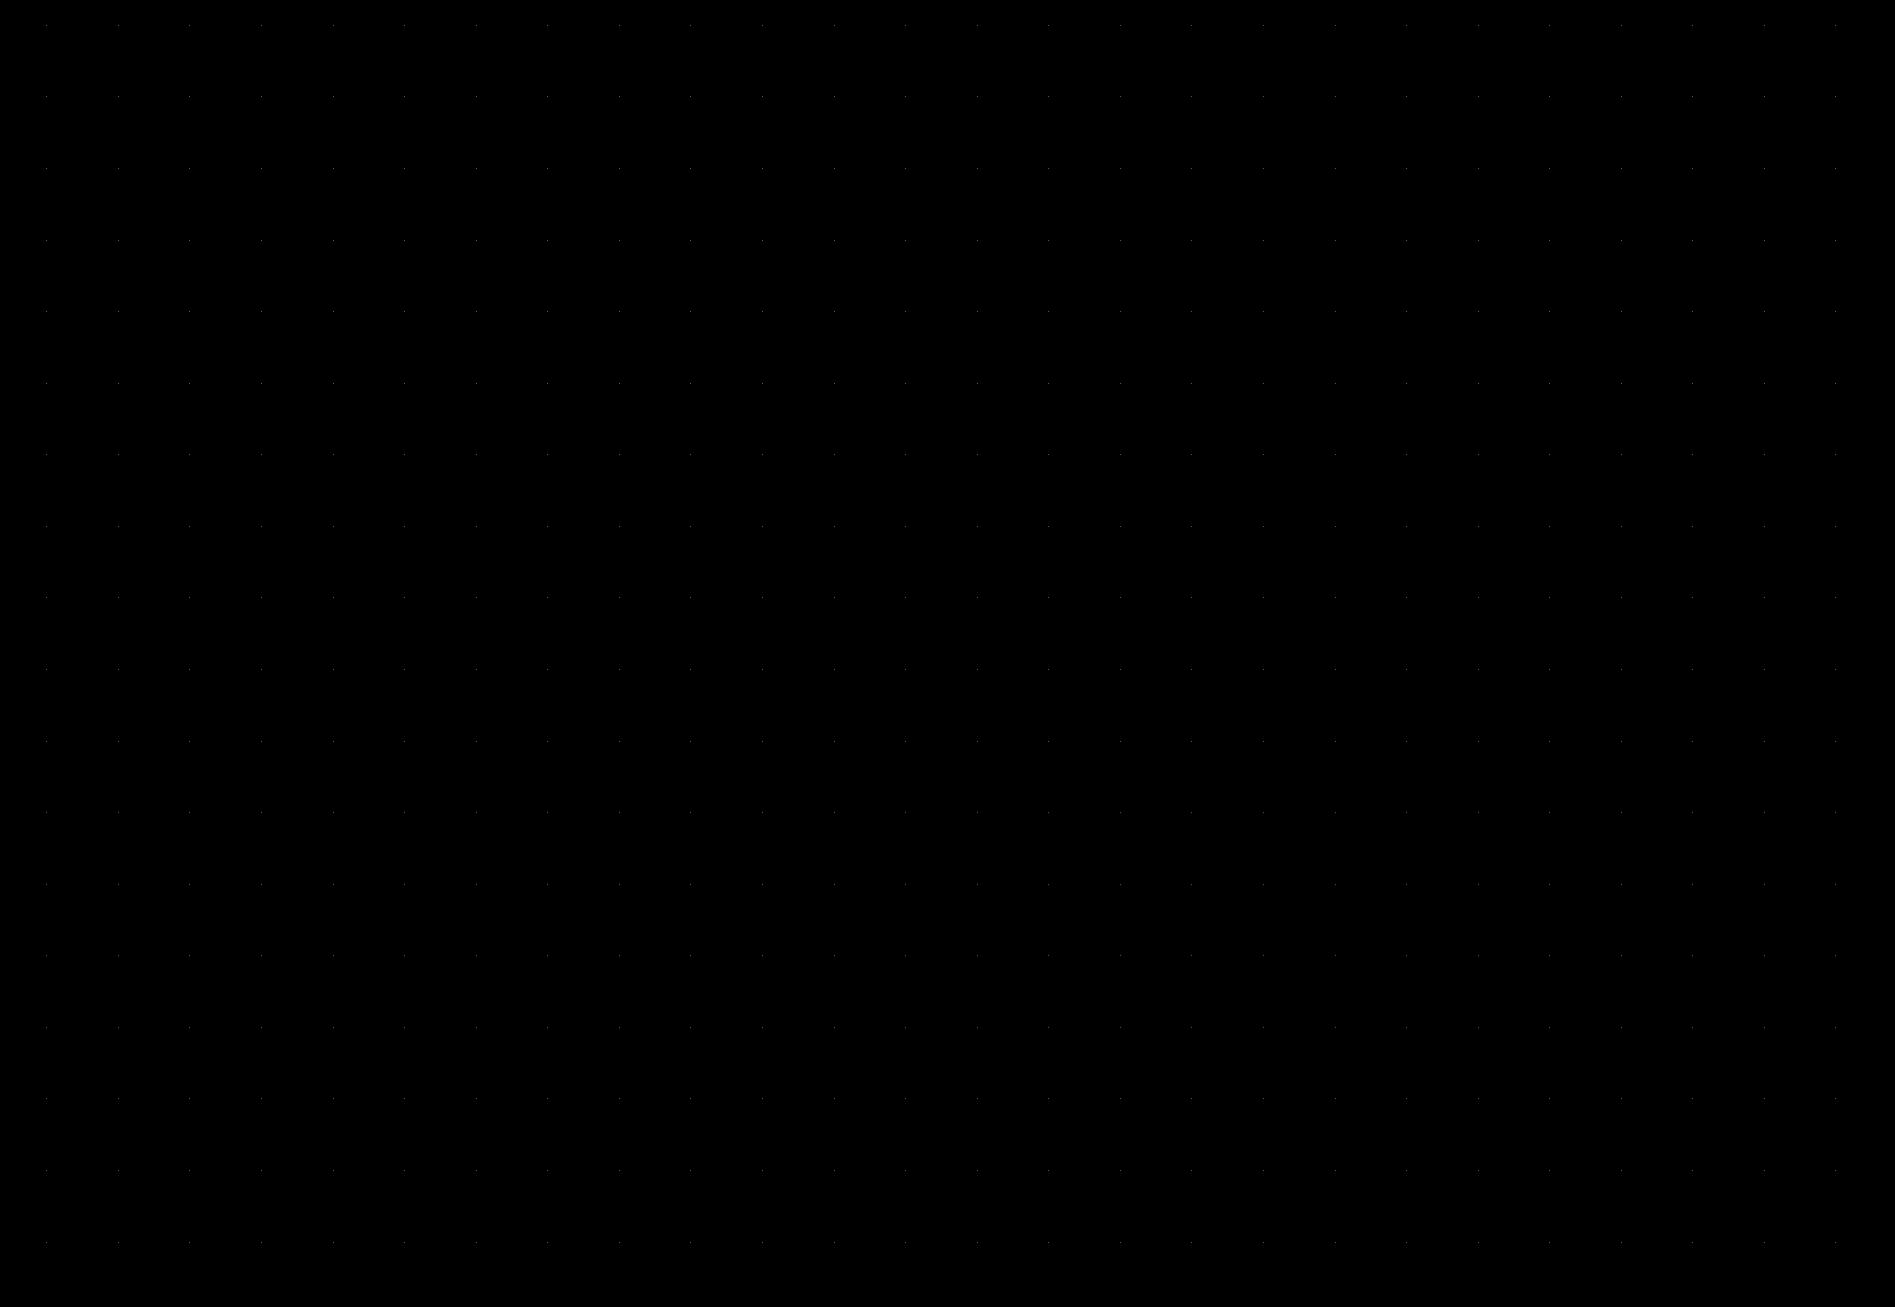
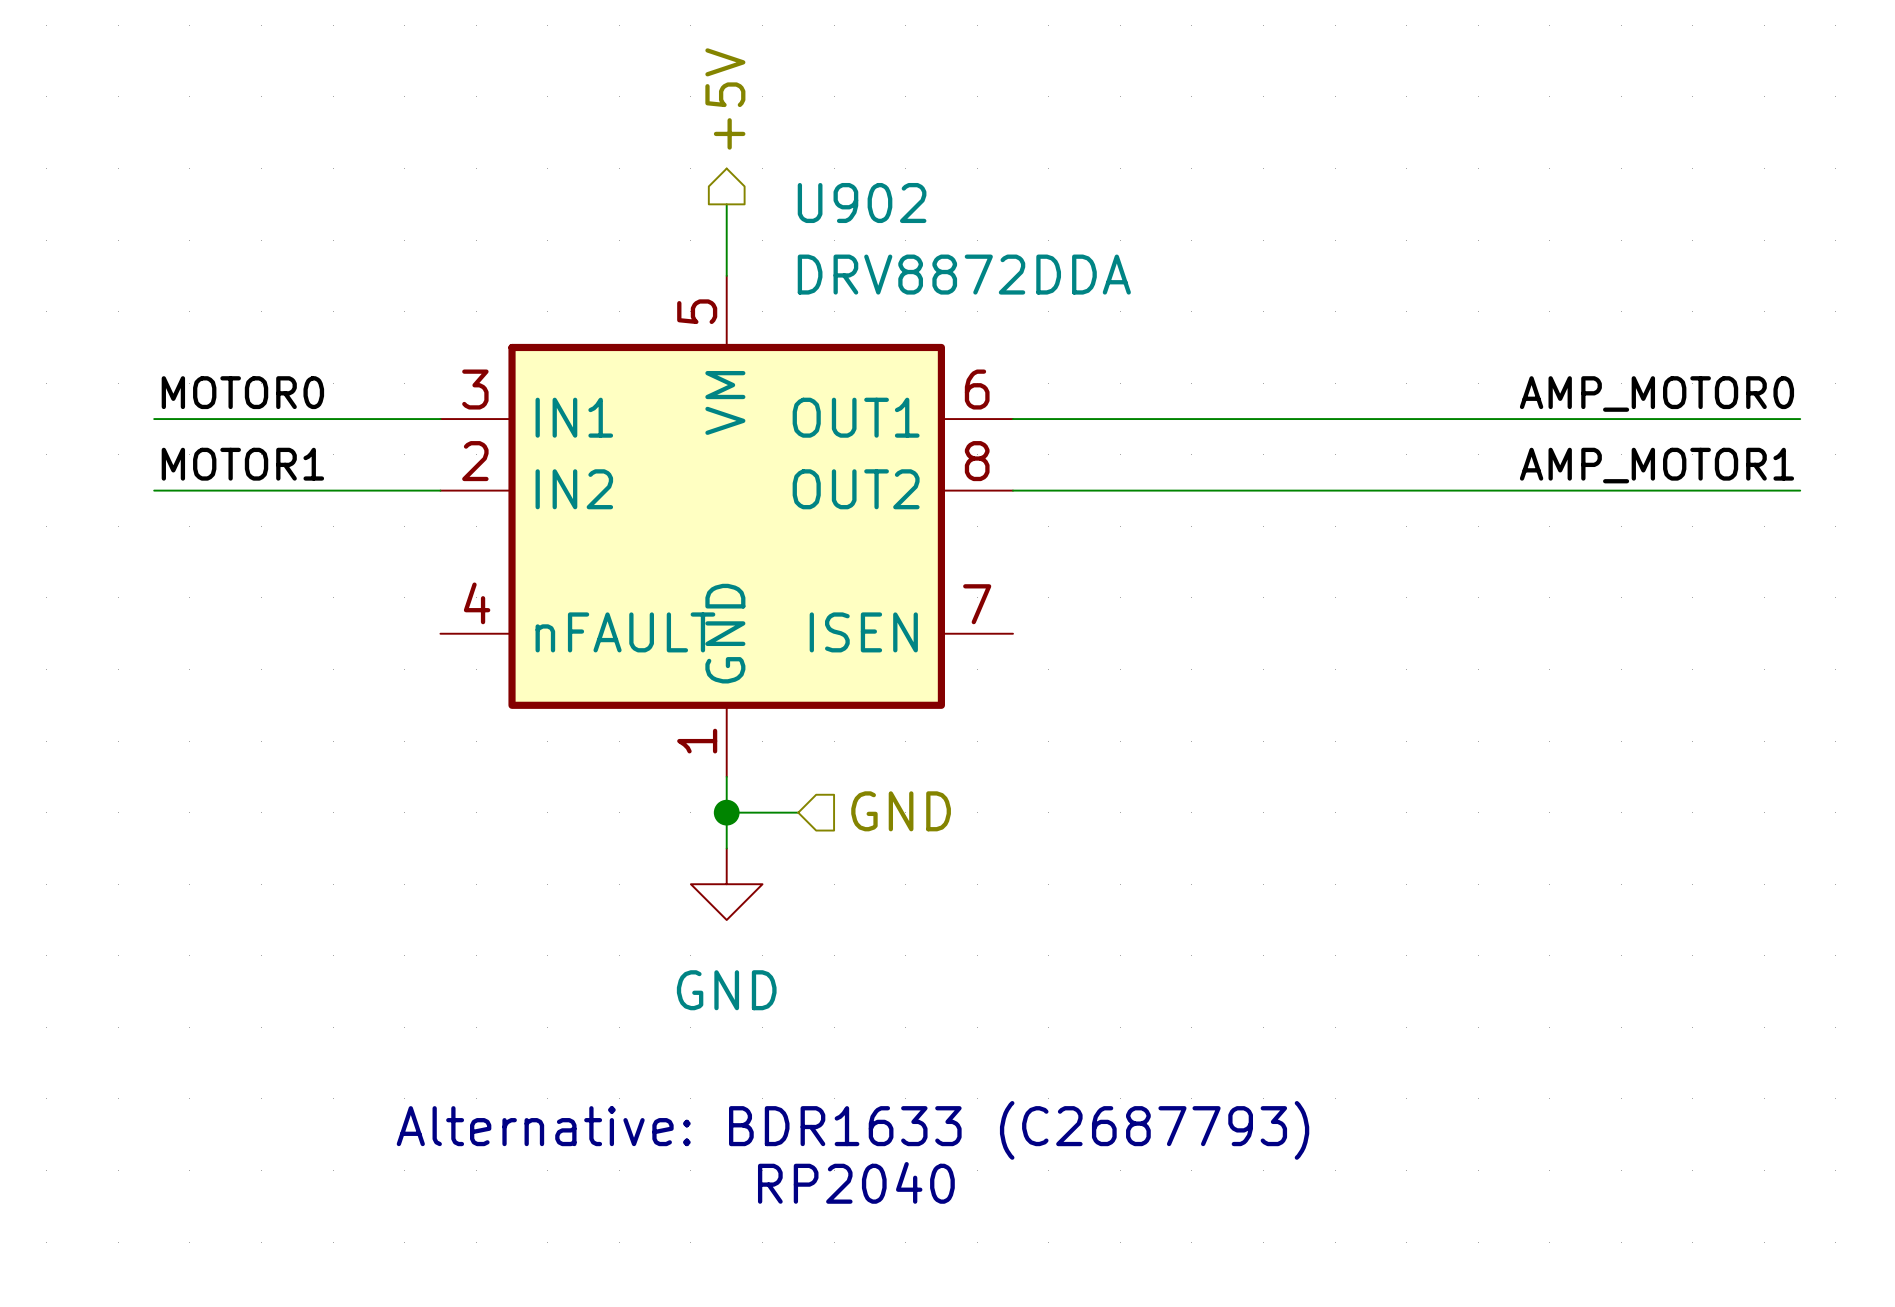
hierarchical label: none -> +5V (725, 98)
wire: none -> (726, 204) (726, 275)
label: none -> MOTOR0 (242, 392)
label: none -> AMP_MOTOR0 (1656, 394)
wire: none -> (154, 419) (440, 419)
wire: none -> (1012, 419) (1800, 419)
label: none -> MOTOR1 (242, 464)
label: none -> AMP_MOTOR1 (1656, 465)
wire: none -> (154, 490) (440, 490)
wire: none -> (1012, 490) (1800, 490)
U902: none -> DRV8872DDA (726, 526)
wire: none -> (726, 776) (726, 848)
hierarchical label: none -> GND (901, 811)
wire: none -> (726, 812) (798, 812)
junction: none -> (726, 812)
power symbol: none -> GND (726, 884)
text: none -> Alternative: BDR1633 (C2687793) (852, 1130)
text: none -> RP2040 (856, 1182)

